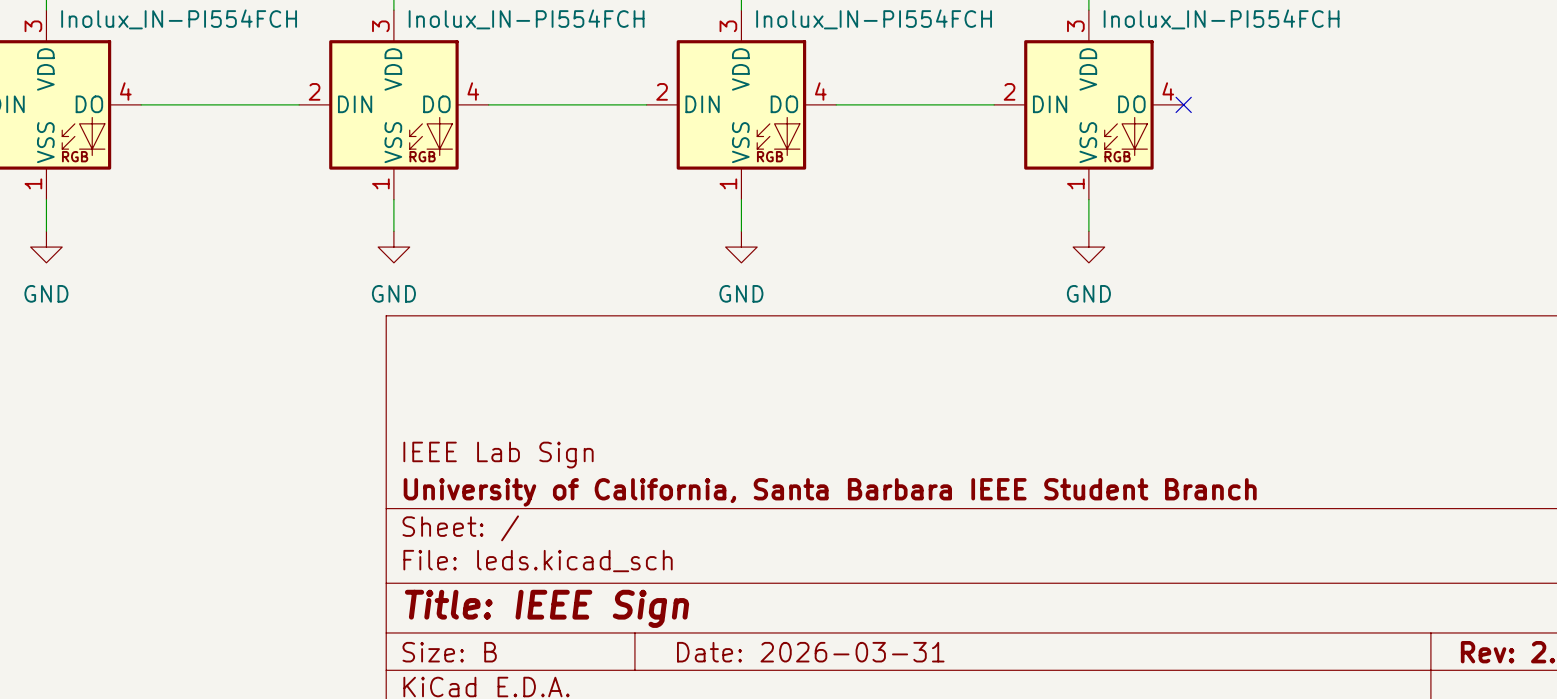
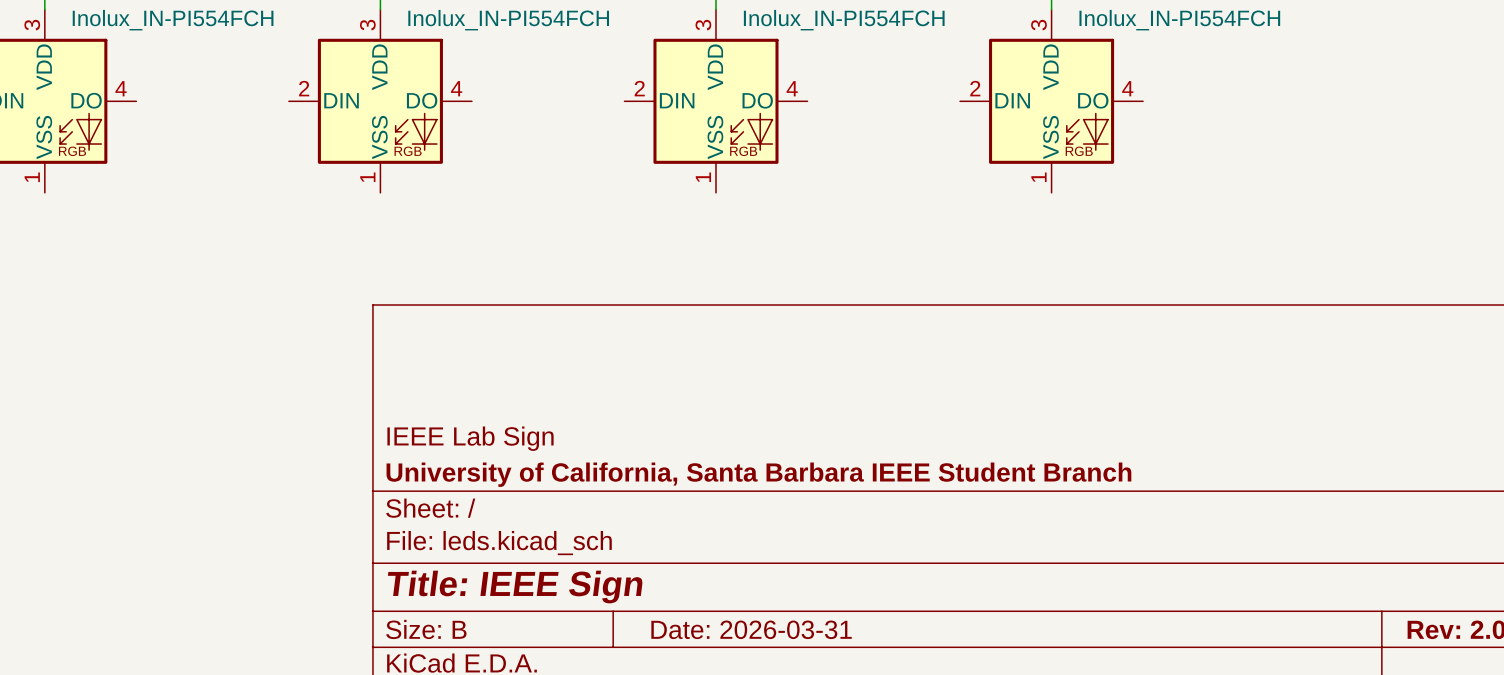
wire: (141, 104) (299, 104) -> none
wire: (488, 104) (646, 104) -> none
wire: (836, 104) (994, 104) -> none
no-connect mark: (1183, 104) -> none
wire: (46, 199) (46, 231) -> none
wire: (393, 199) (393, 231) -> none
wire: (741, 199) (741, 231) -> none
wire: (1088, 199) (1088, 231) -> none
power symbol: GND (46, 247) -> none
power symbol: GND (393, 247) -> none
power symbol: GND (741, 247) -> none
power symbol: GND (1088, 247) -> none

